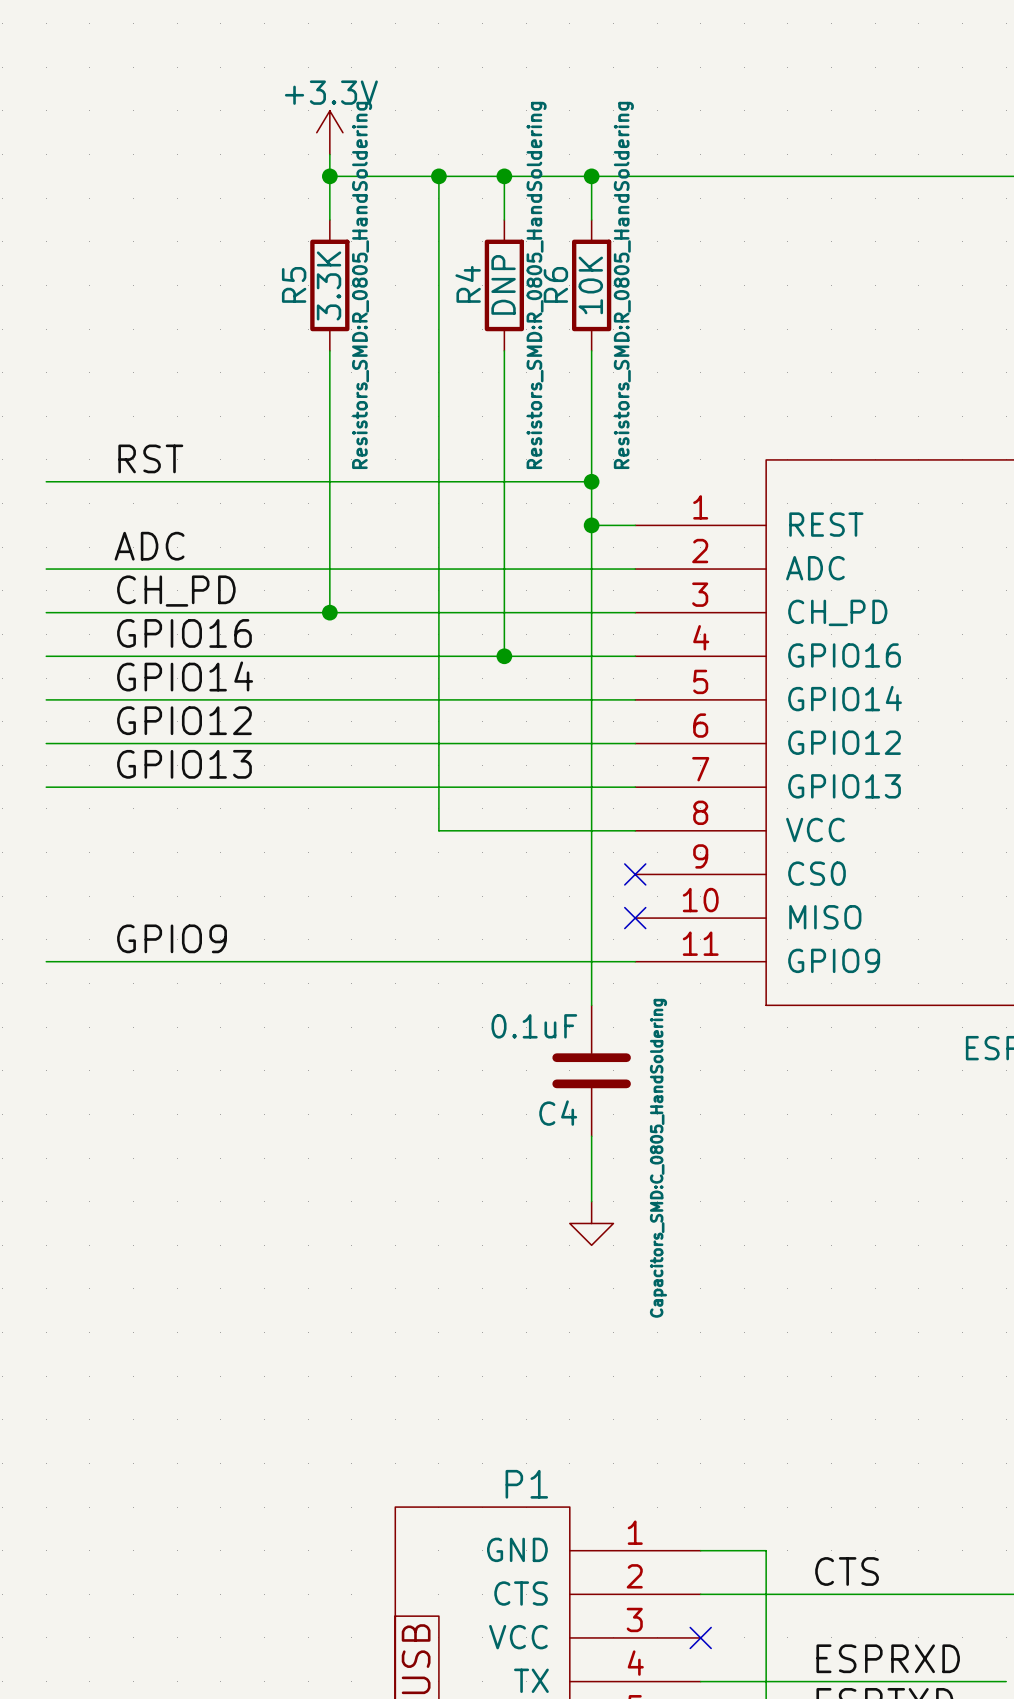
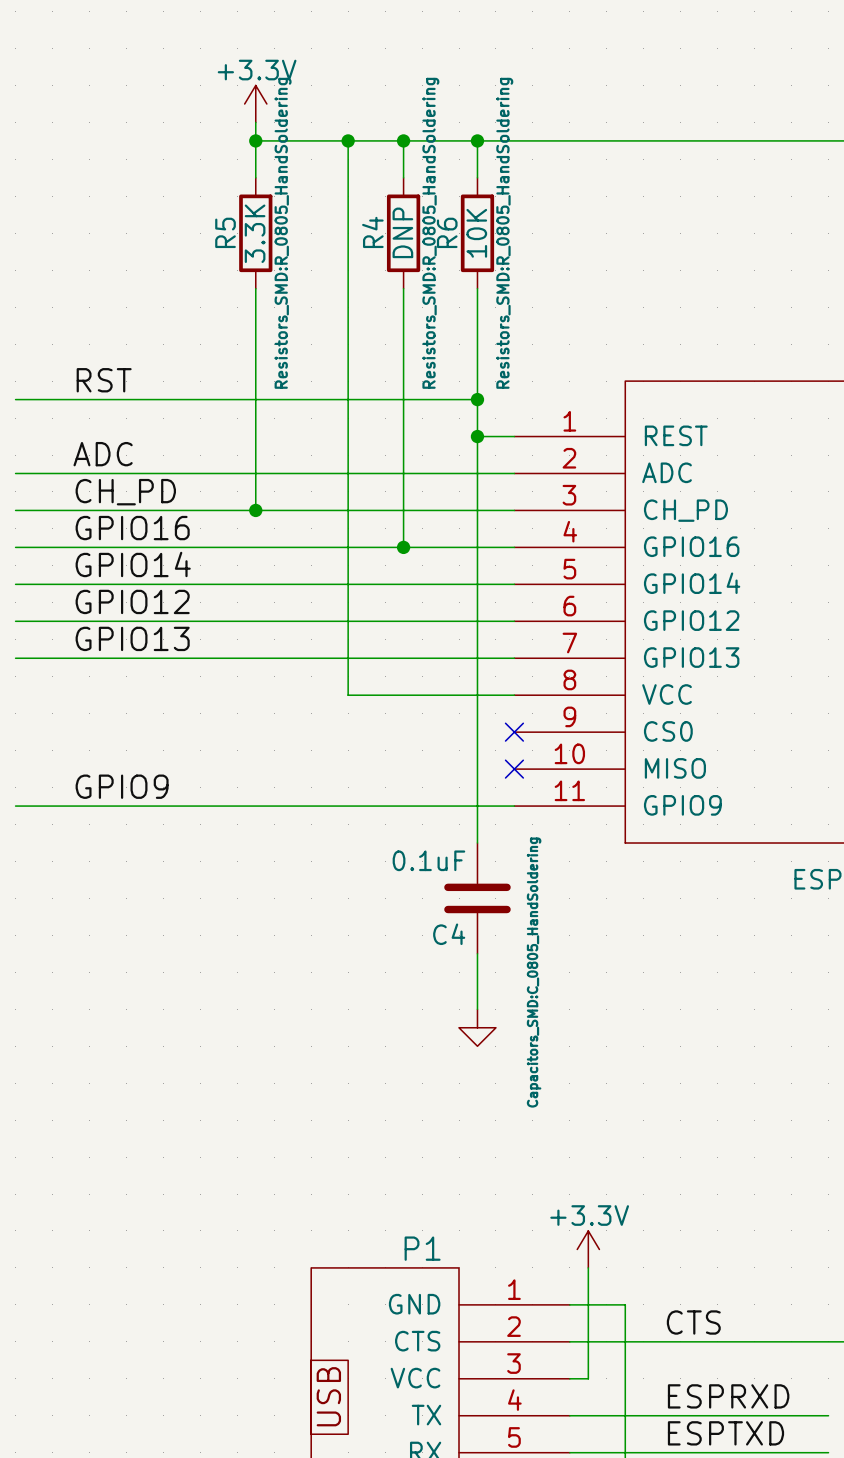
power symbol: none -> +3.3V (588, 1249)
wire: none -> (588, 1267) (588, 1378) (569, 1378)
no-connect mark: (700, 1637) -> none

